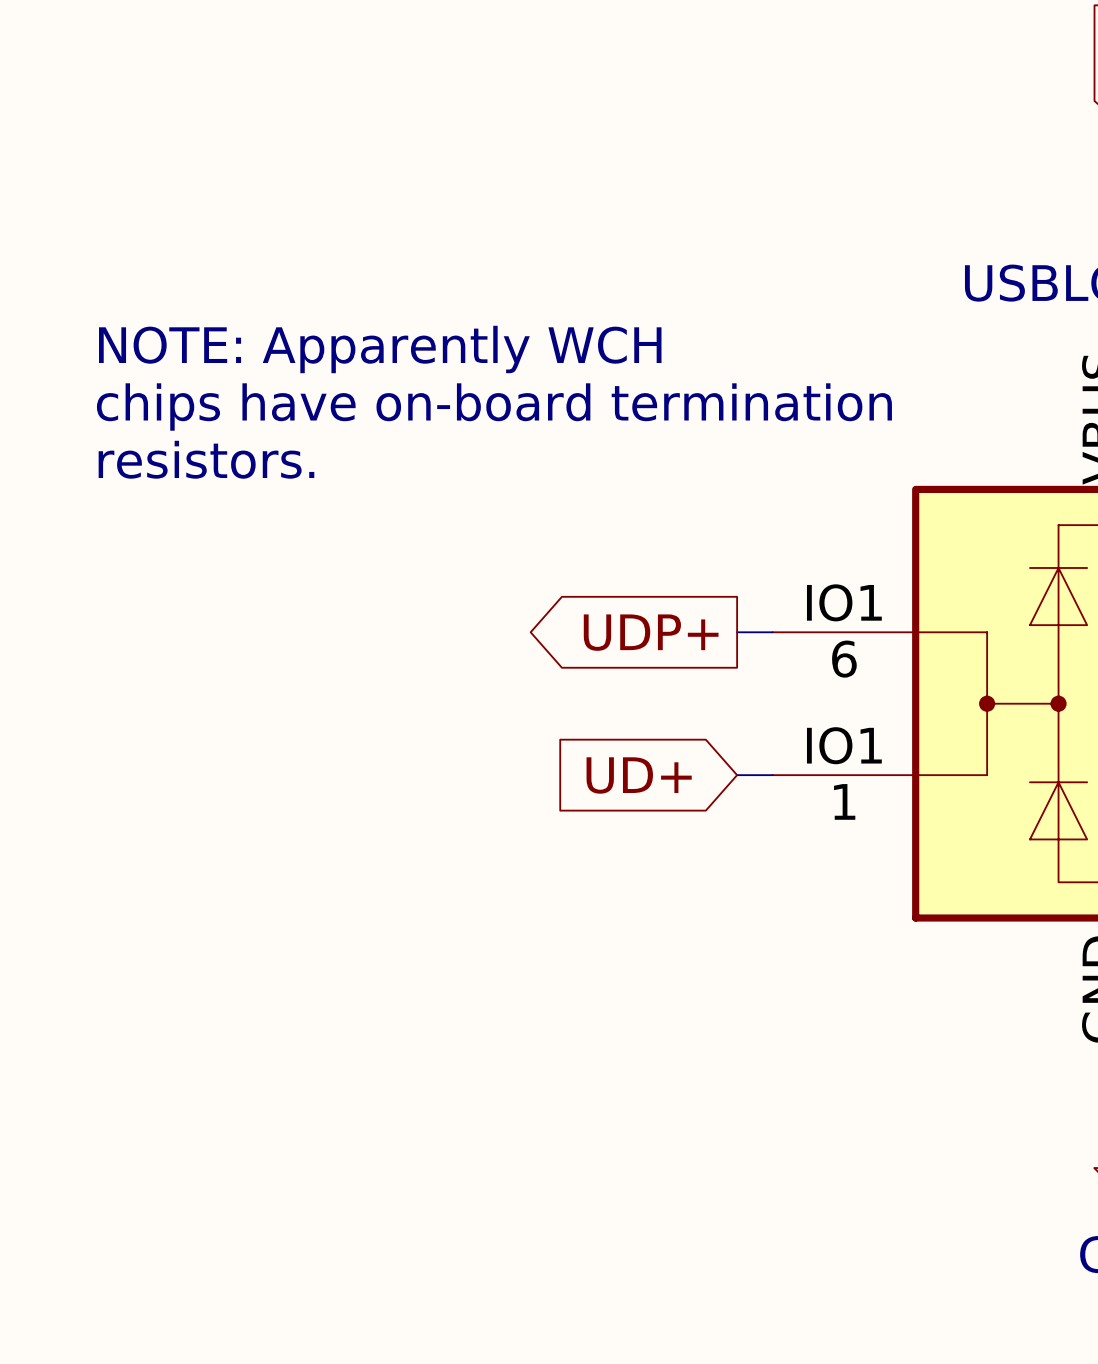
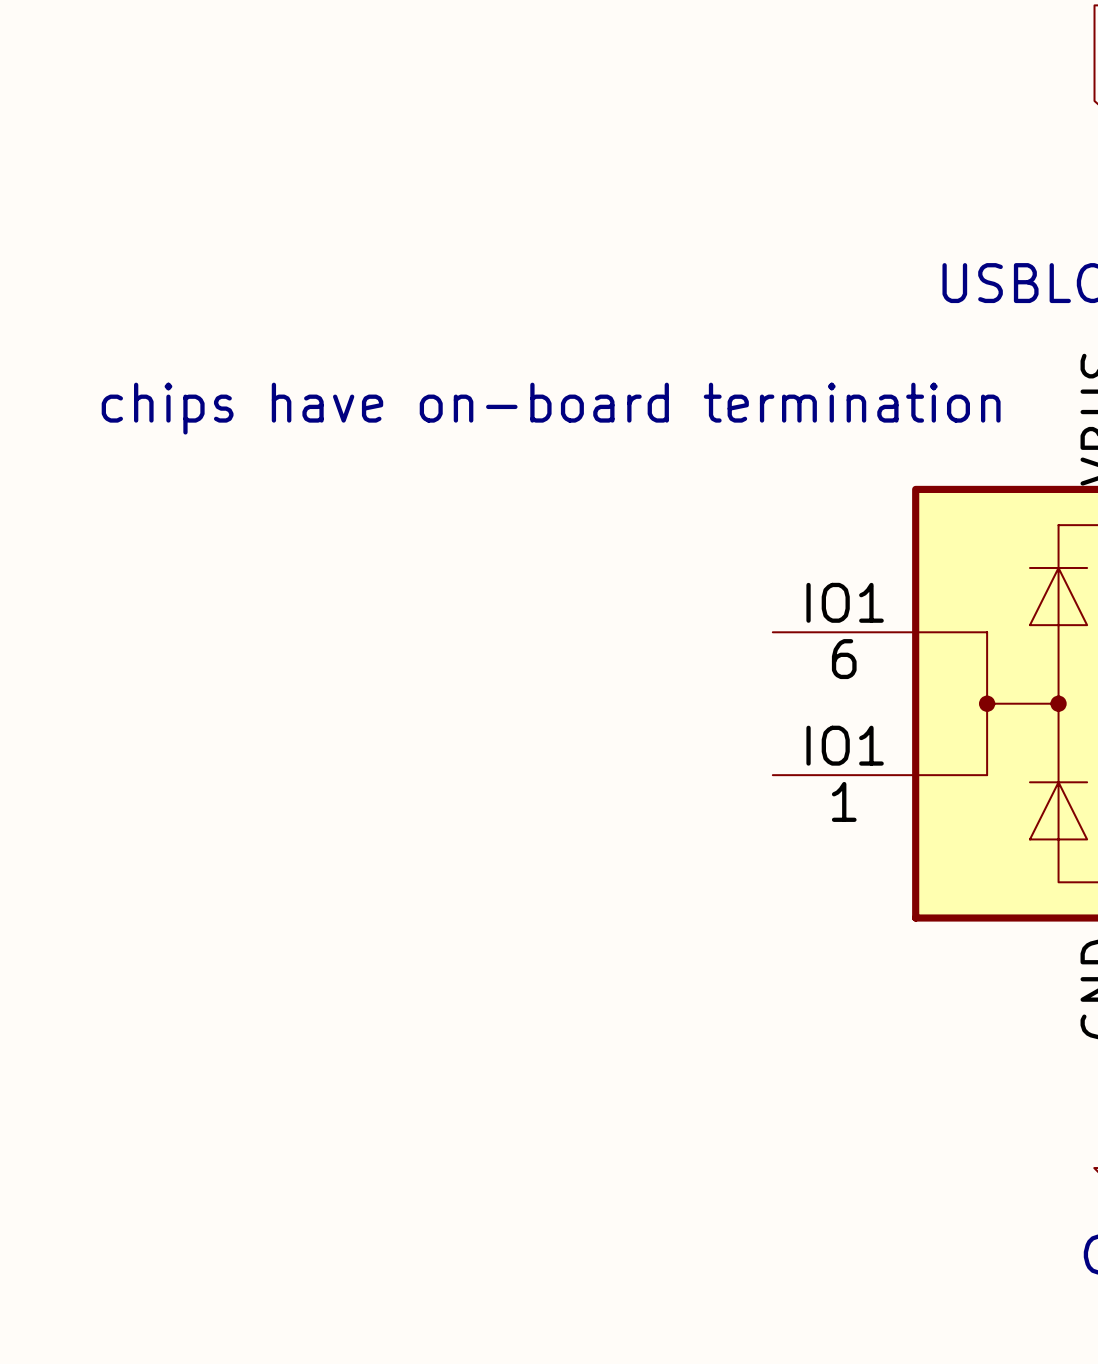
text: NOTE: Apparently WCH (380, 349) -> none
text: resistors. (206, 459) -> none
global label: UDP+ (651, 632) -> none
wire: (737, 632) (772, 632) -> none
global label: UD+ (639, 775) -> none
wire: (737, 775) (772, 775) -> none

